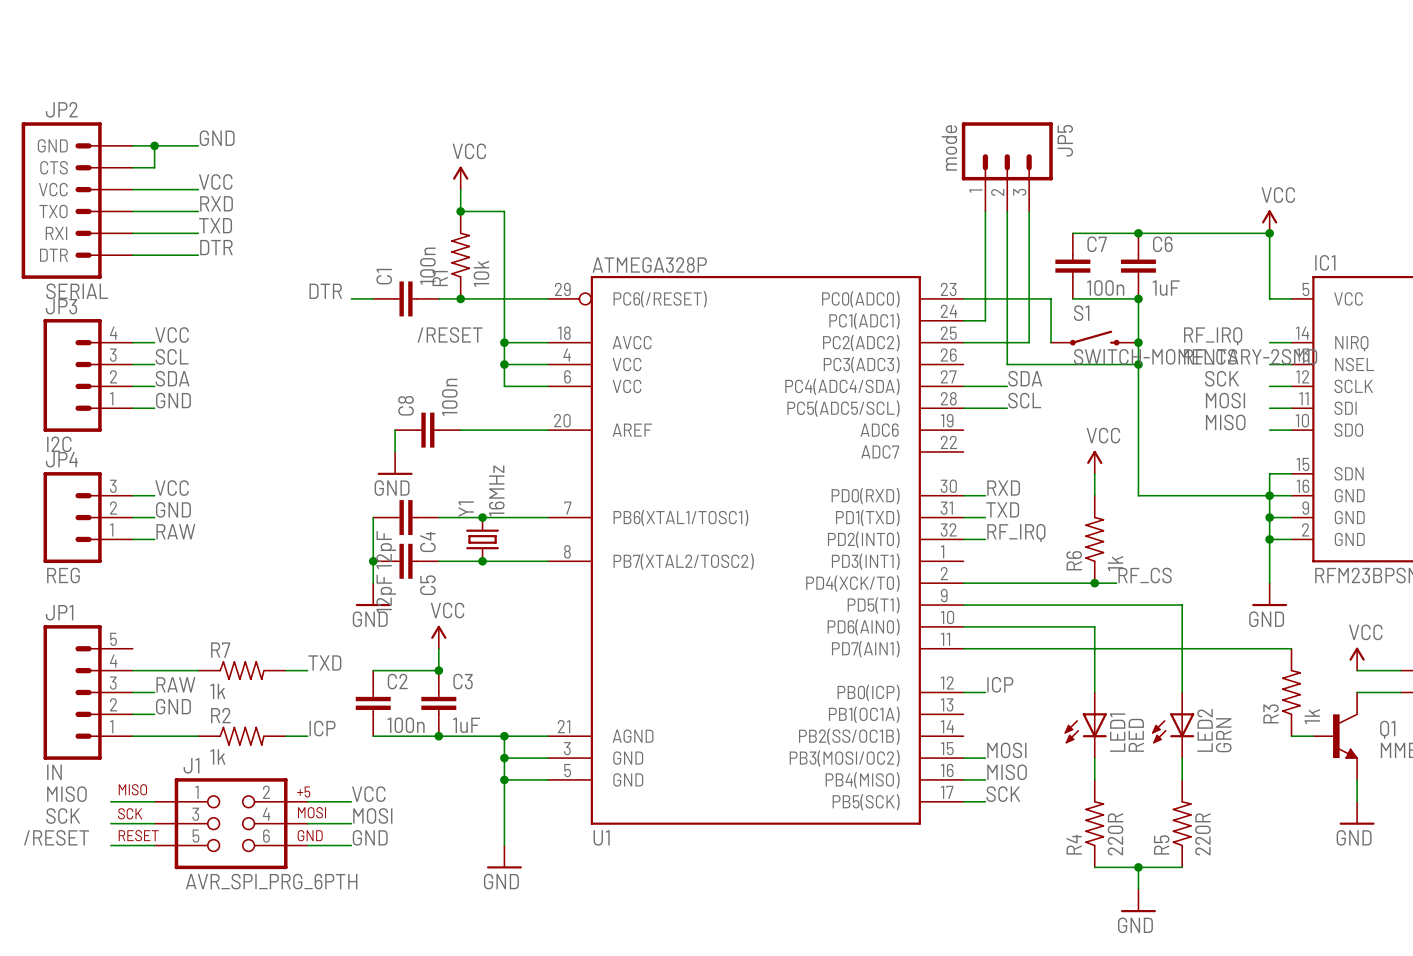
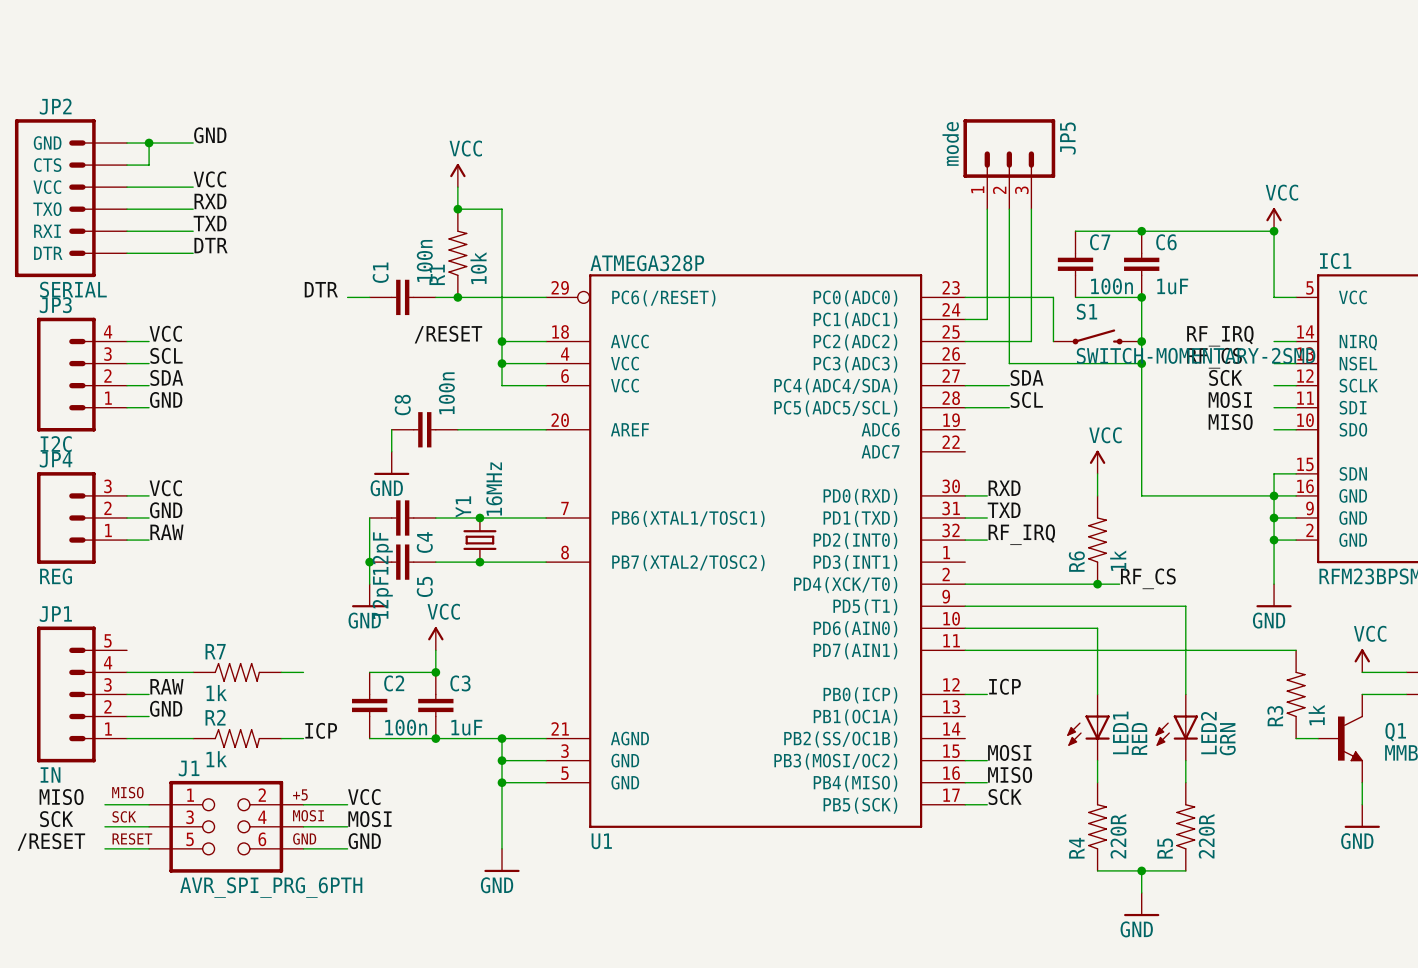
label: TXD (324, 662) -> none

